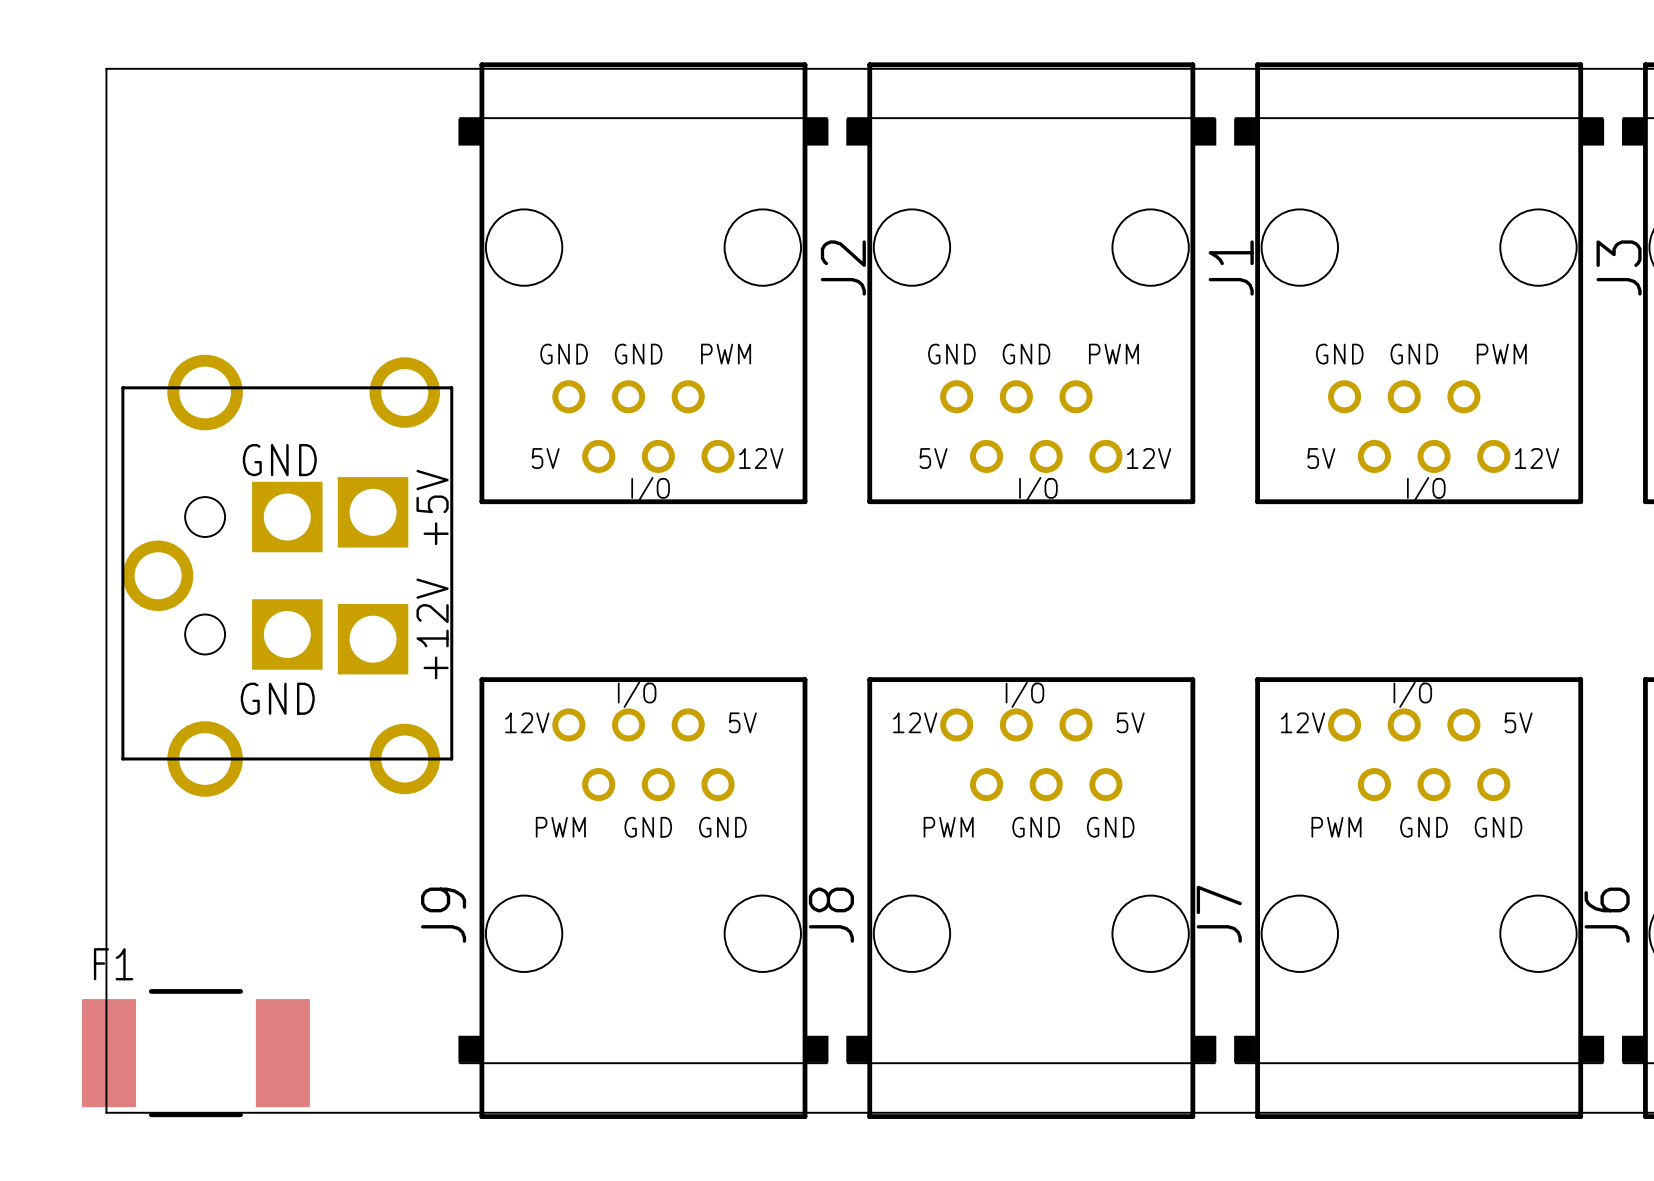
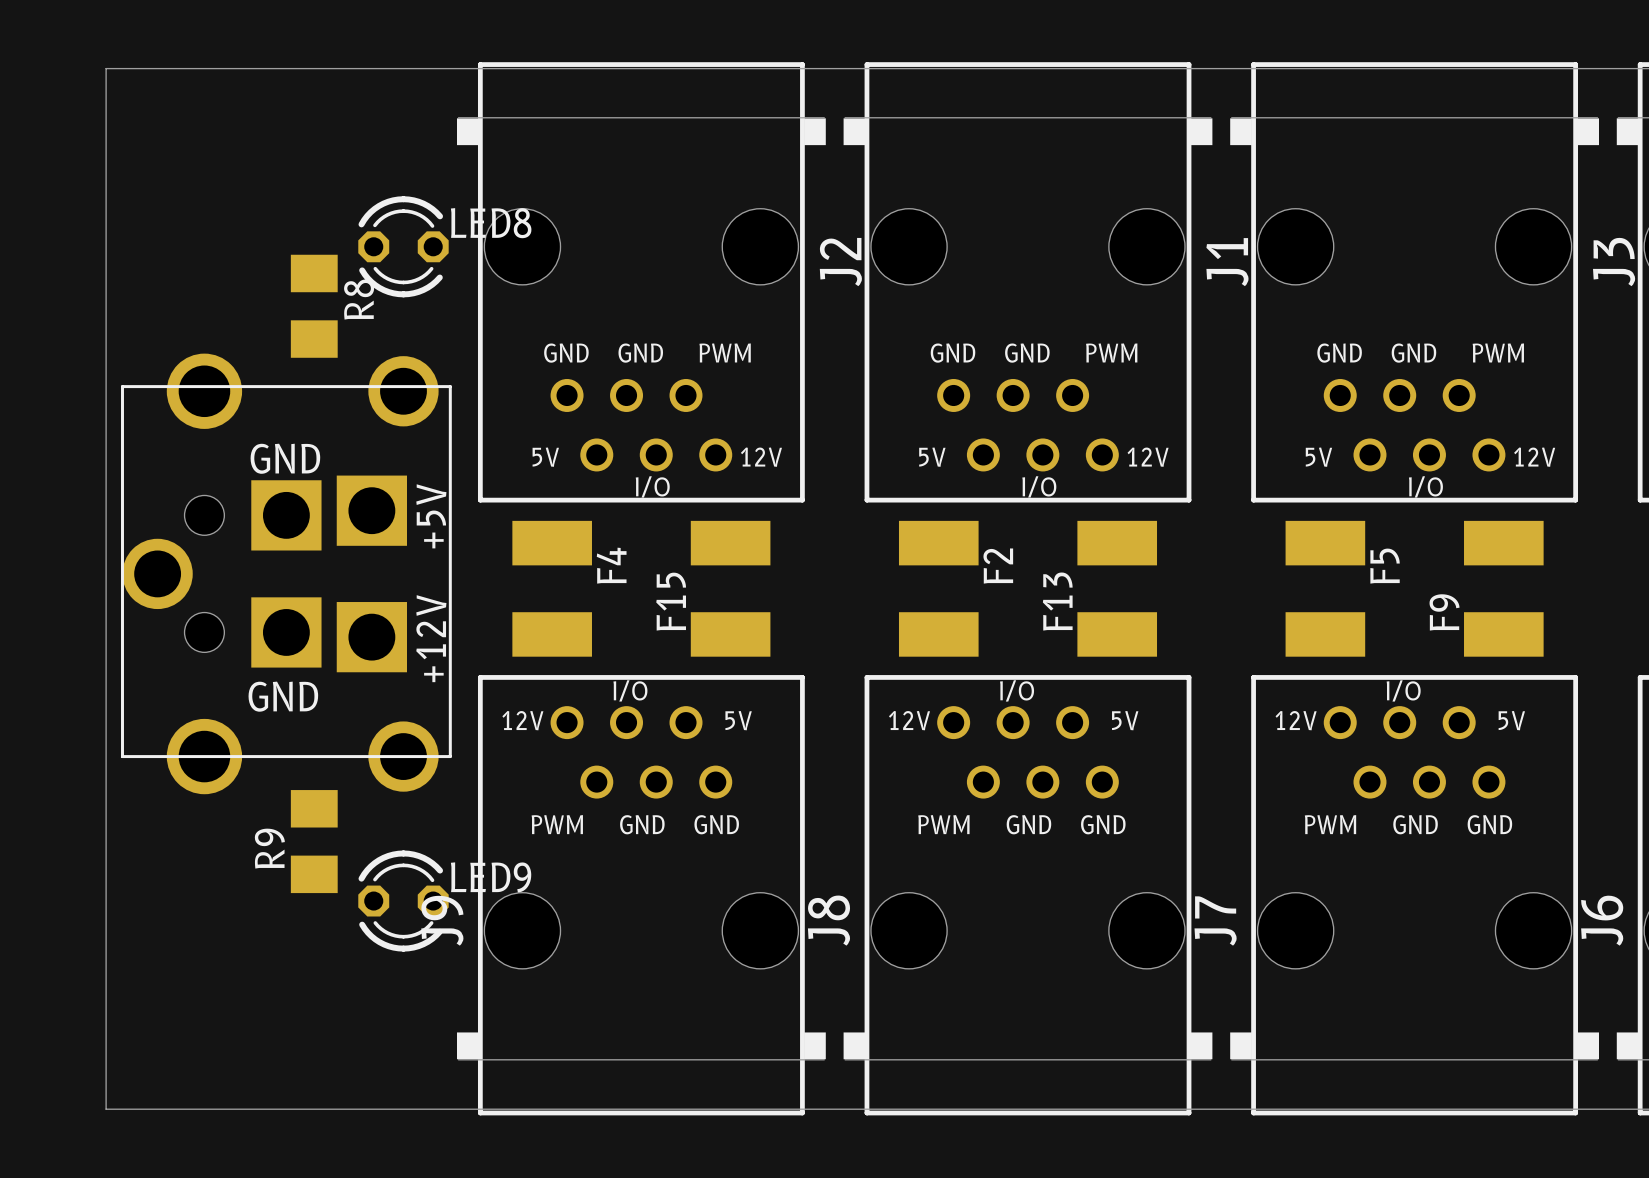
LED8: none -> (403, 246)
R8: none -> (314, 306)
F4: none -> (552, 588)
F15: none -> (730, 588)
F2: none -> (938, 588)
F13: none -> (1117, 588)
F5: none -> (1325, 588)
F9: none -> (1503, 588)
R9: none -> (314, 841)
LED9: none -> (403, 901)
F1: (195, 1053) -> none

